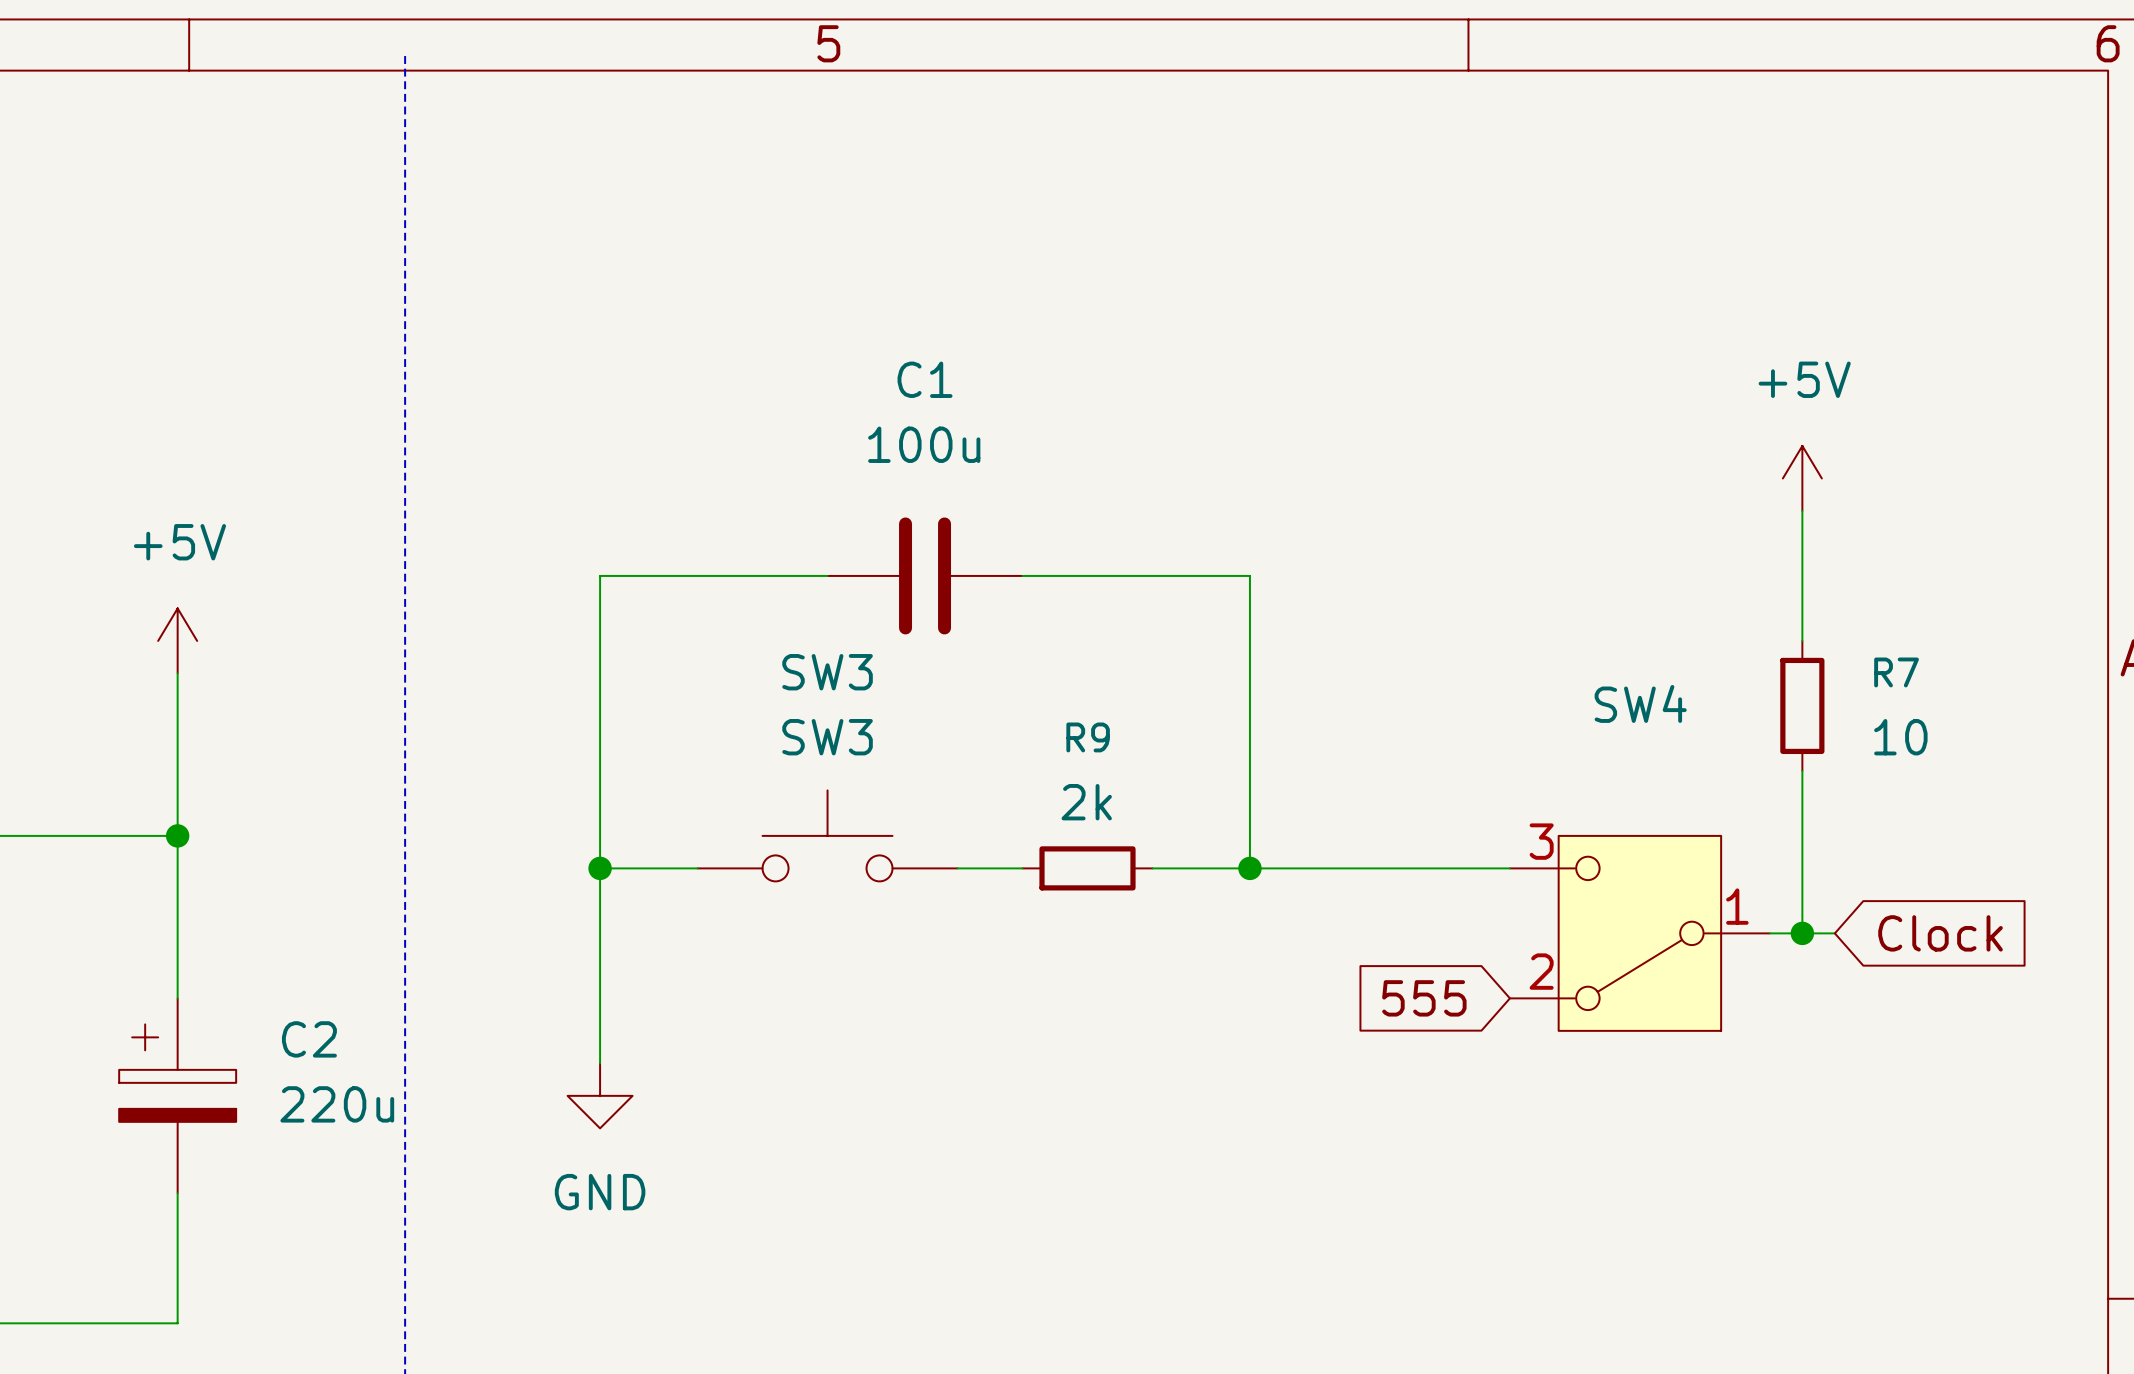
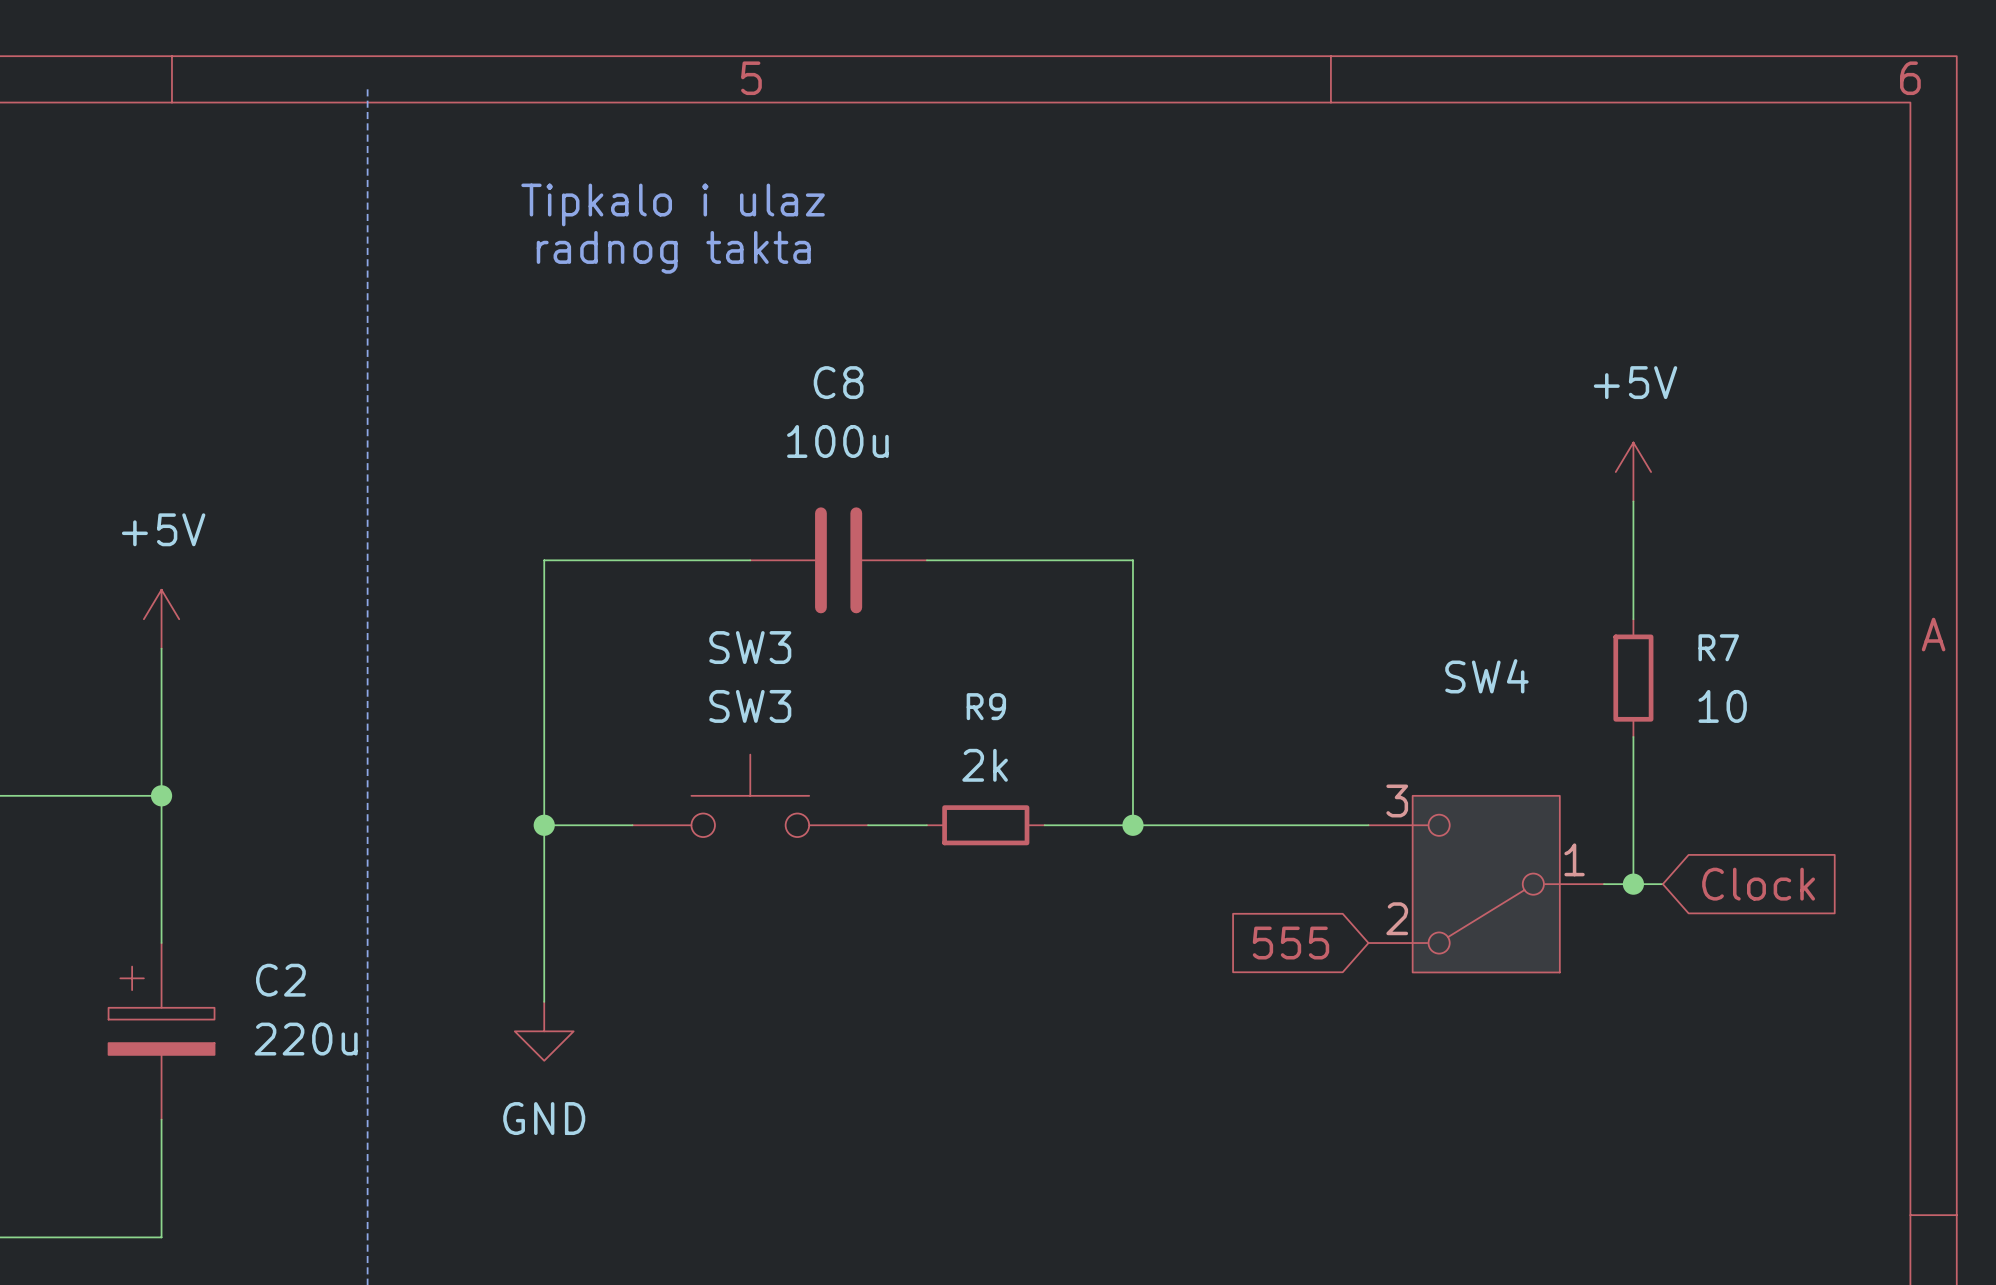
text: none -> Tipkalo i ulaz (673, 204)
text: none -> radnog takta (673, 252)
C1 name: C1 (925, 379) -> C8 (838, 382)

